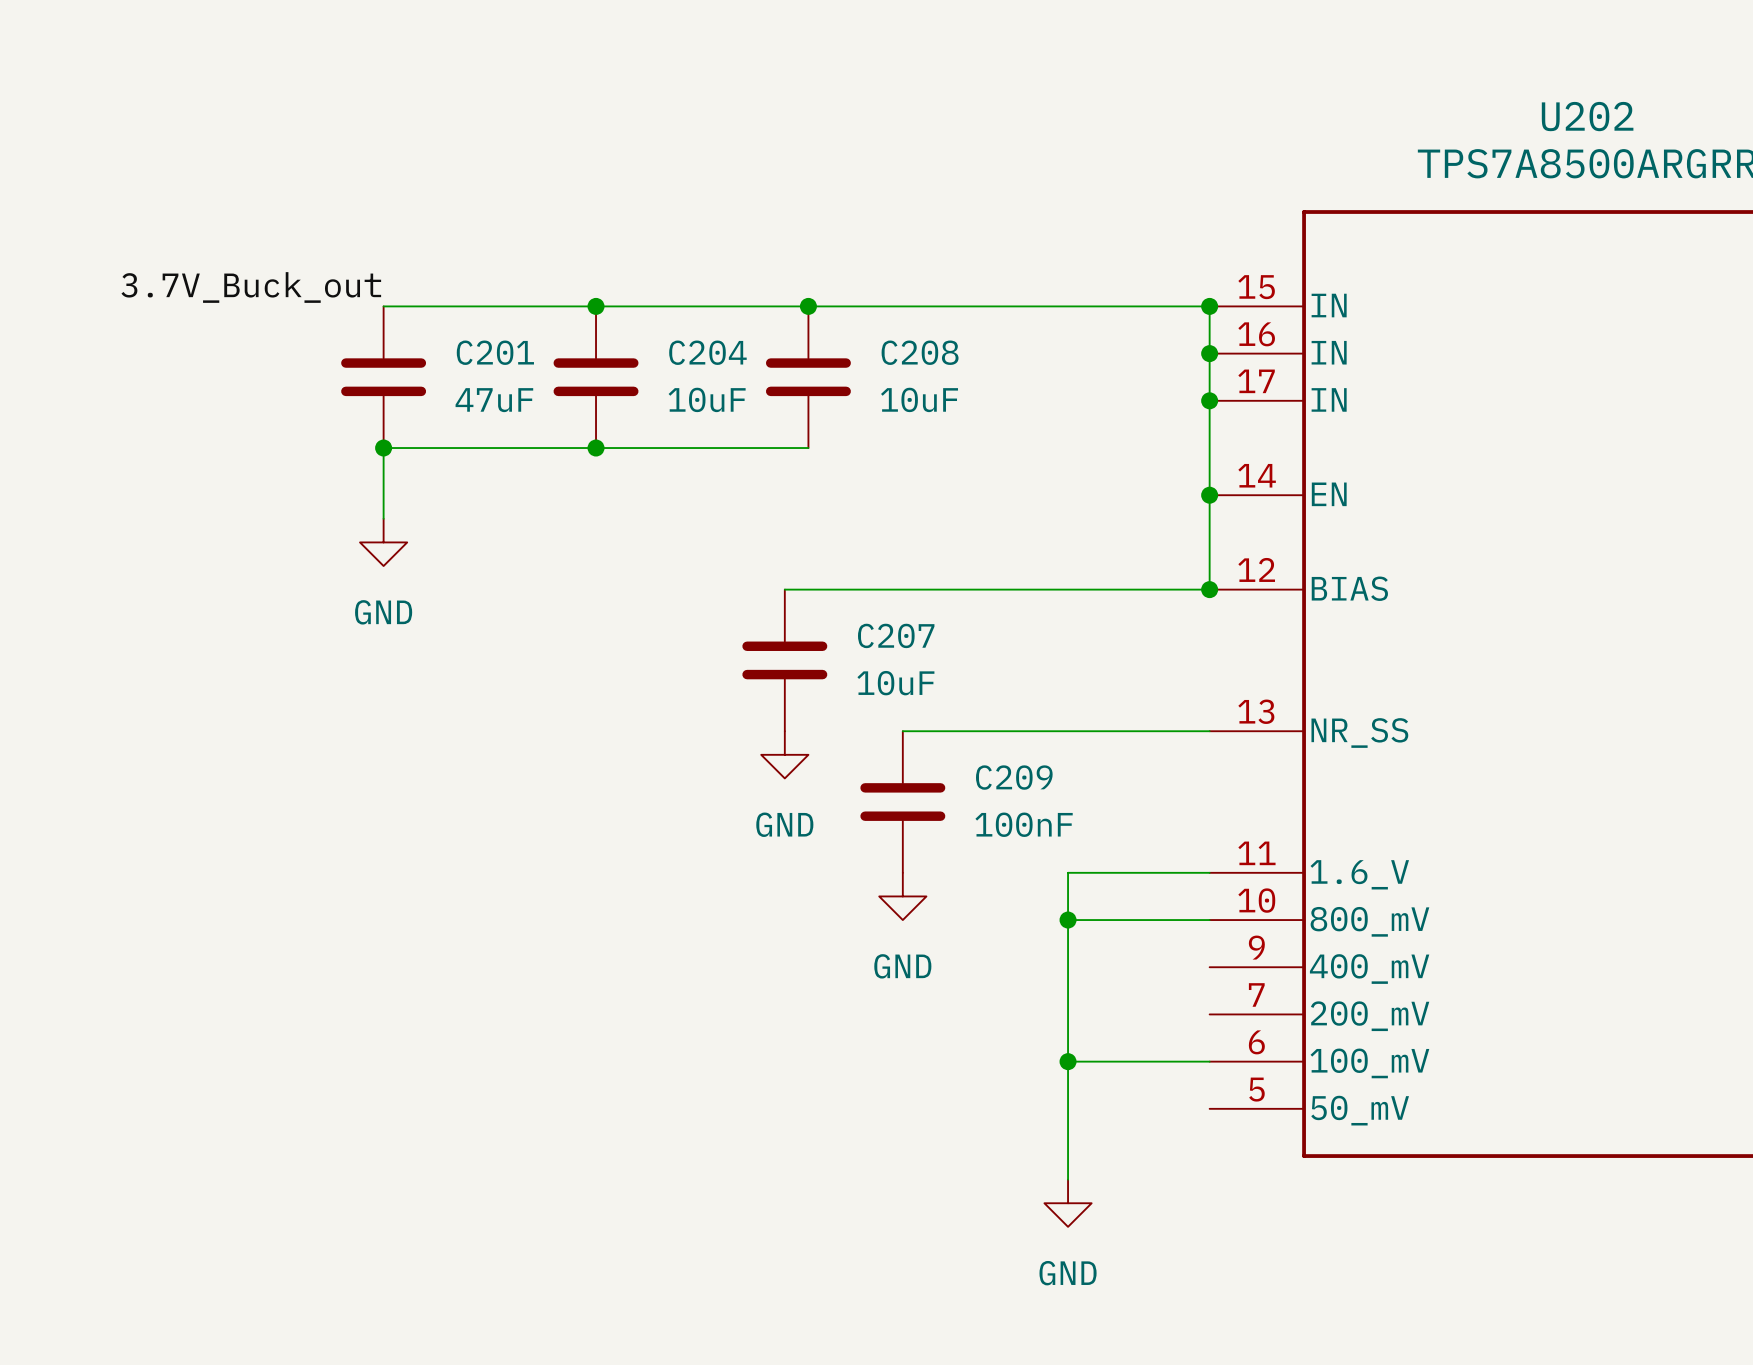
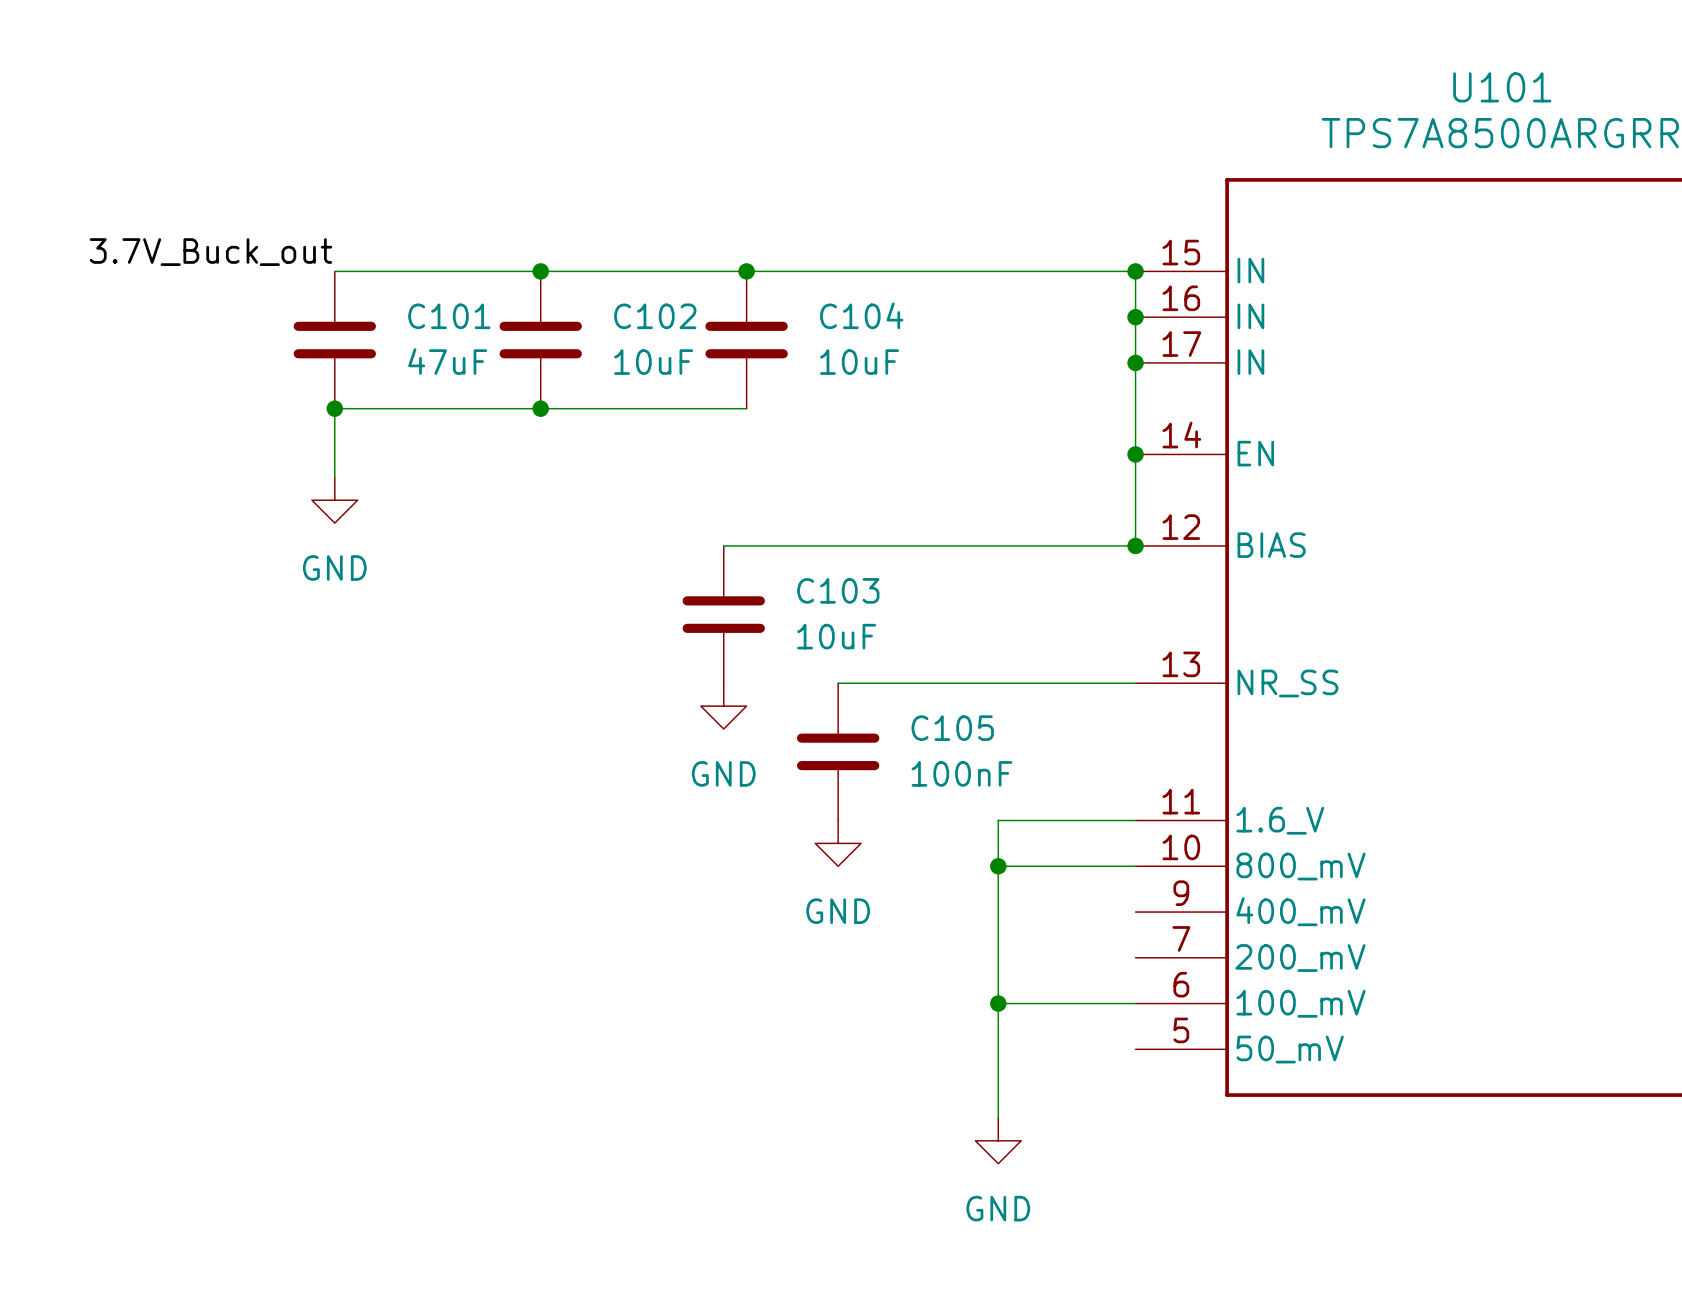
U202 name: U202 (1587, 116) -> U101 (1502, 87)
C201 name: C201 (495, 352) -> C101 (449, 316)
C204 name: C204 (707, 352) -> C102 (655, 316)
C208 name: C208 (920, 352) -> C104 (861, 315)
C207 name: C207 (896, 635) -> C103 (838, 590)
C209 name: C209 (1014, 777) -> C105 (952, 728)

